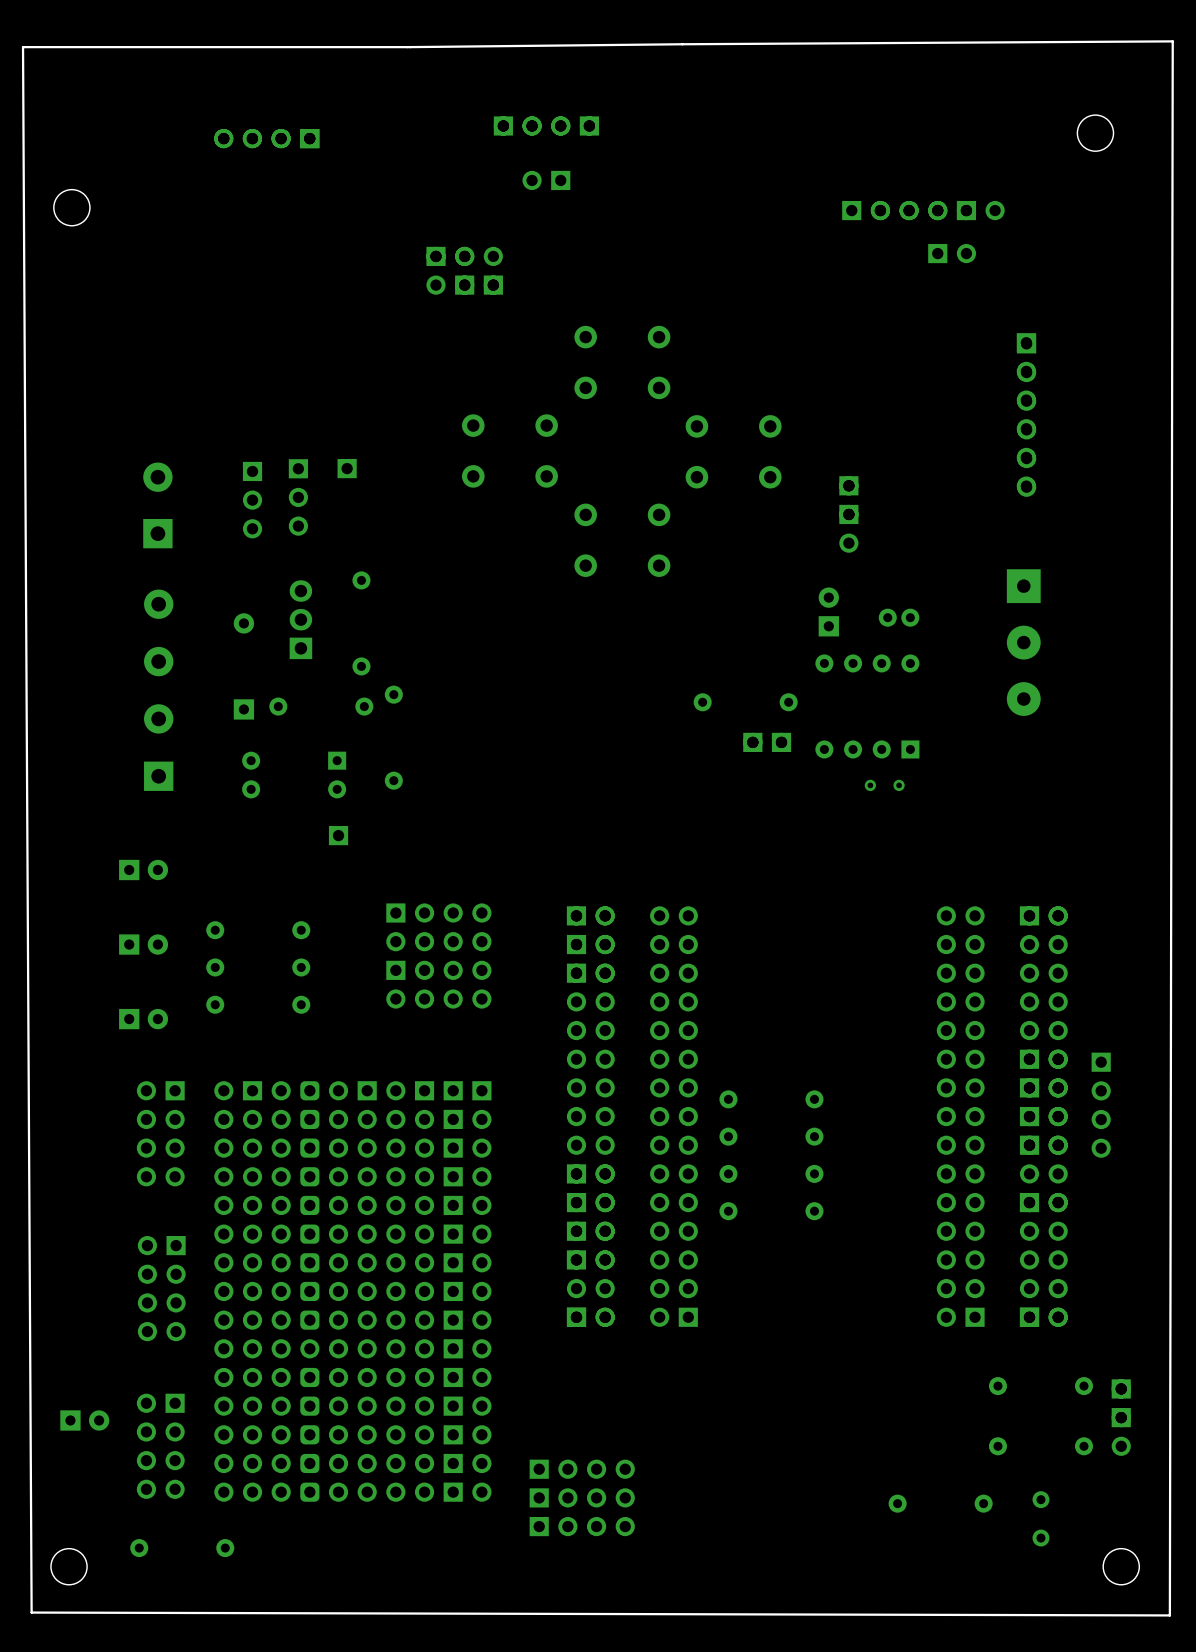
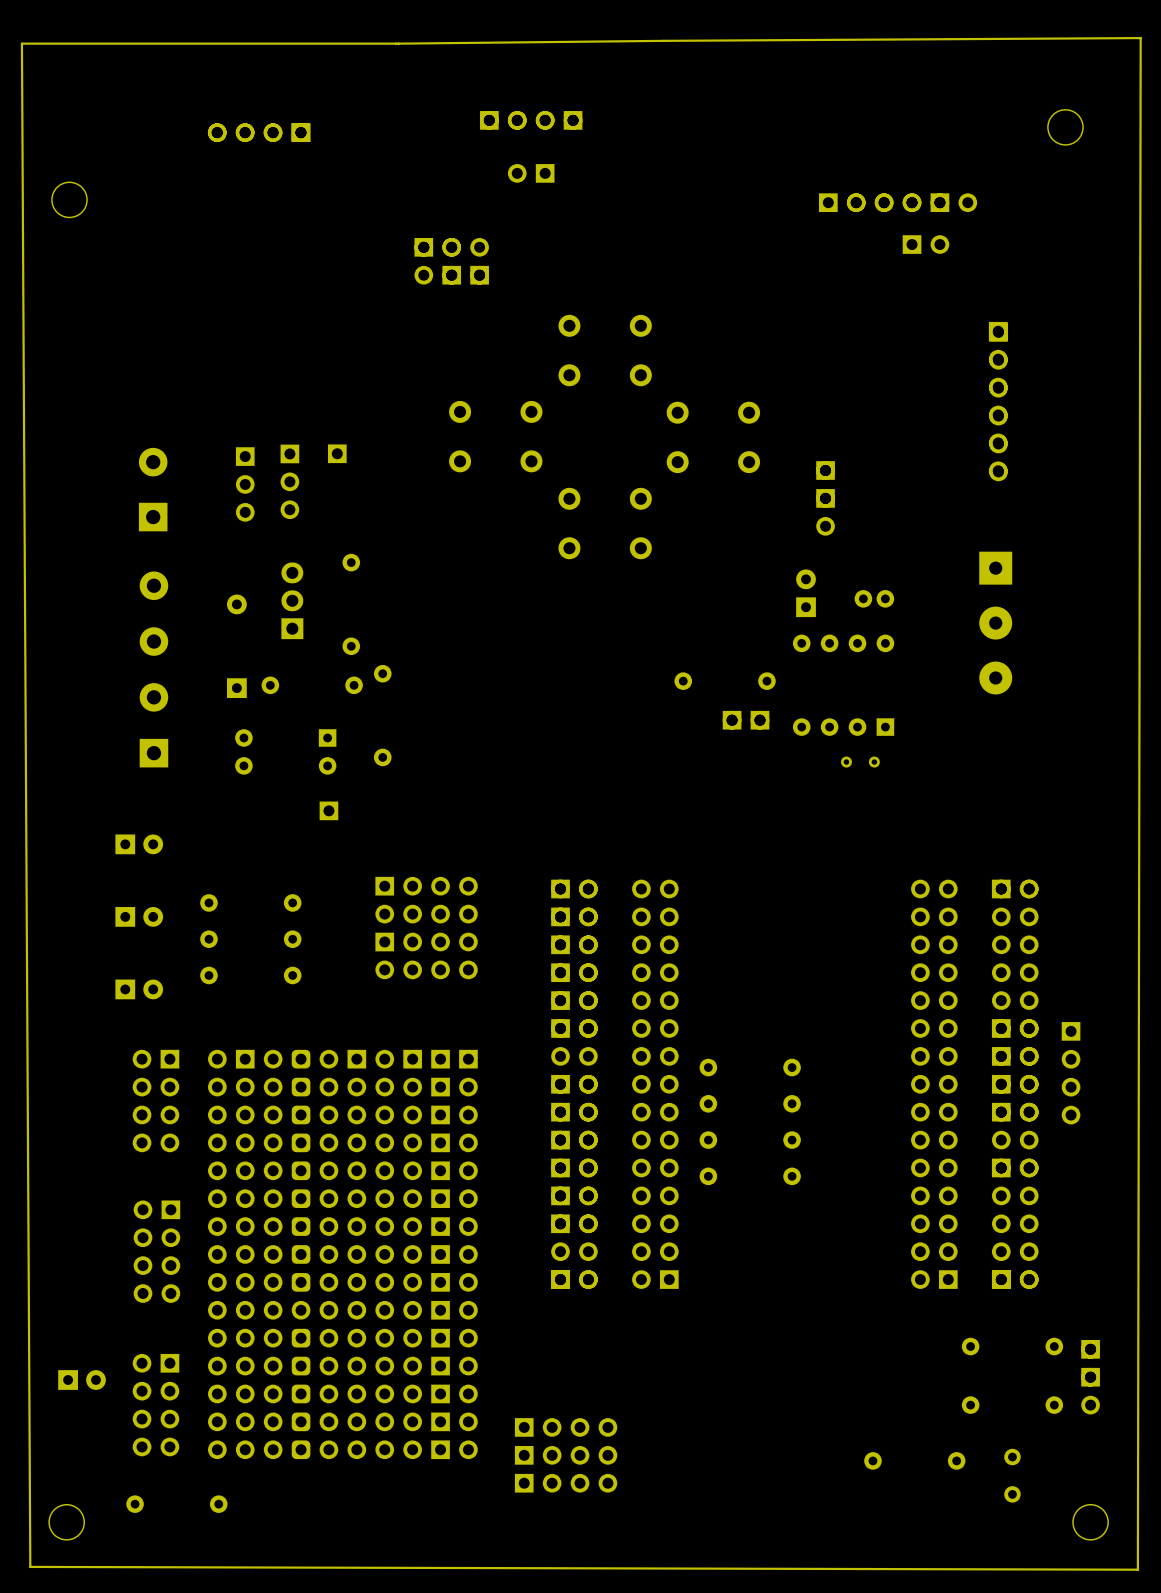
part: none -> (574, 972)
part: none -> (574, 1000)
part: none -> (574, 1028)
part: none -> (574, 1084)
part: none -> (574, 1112)

